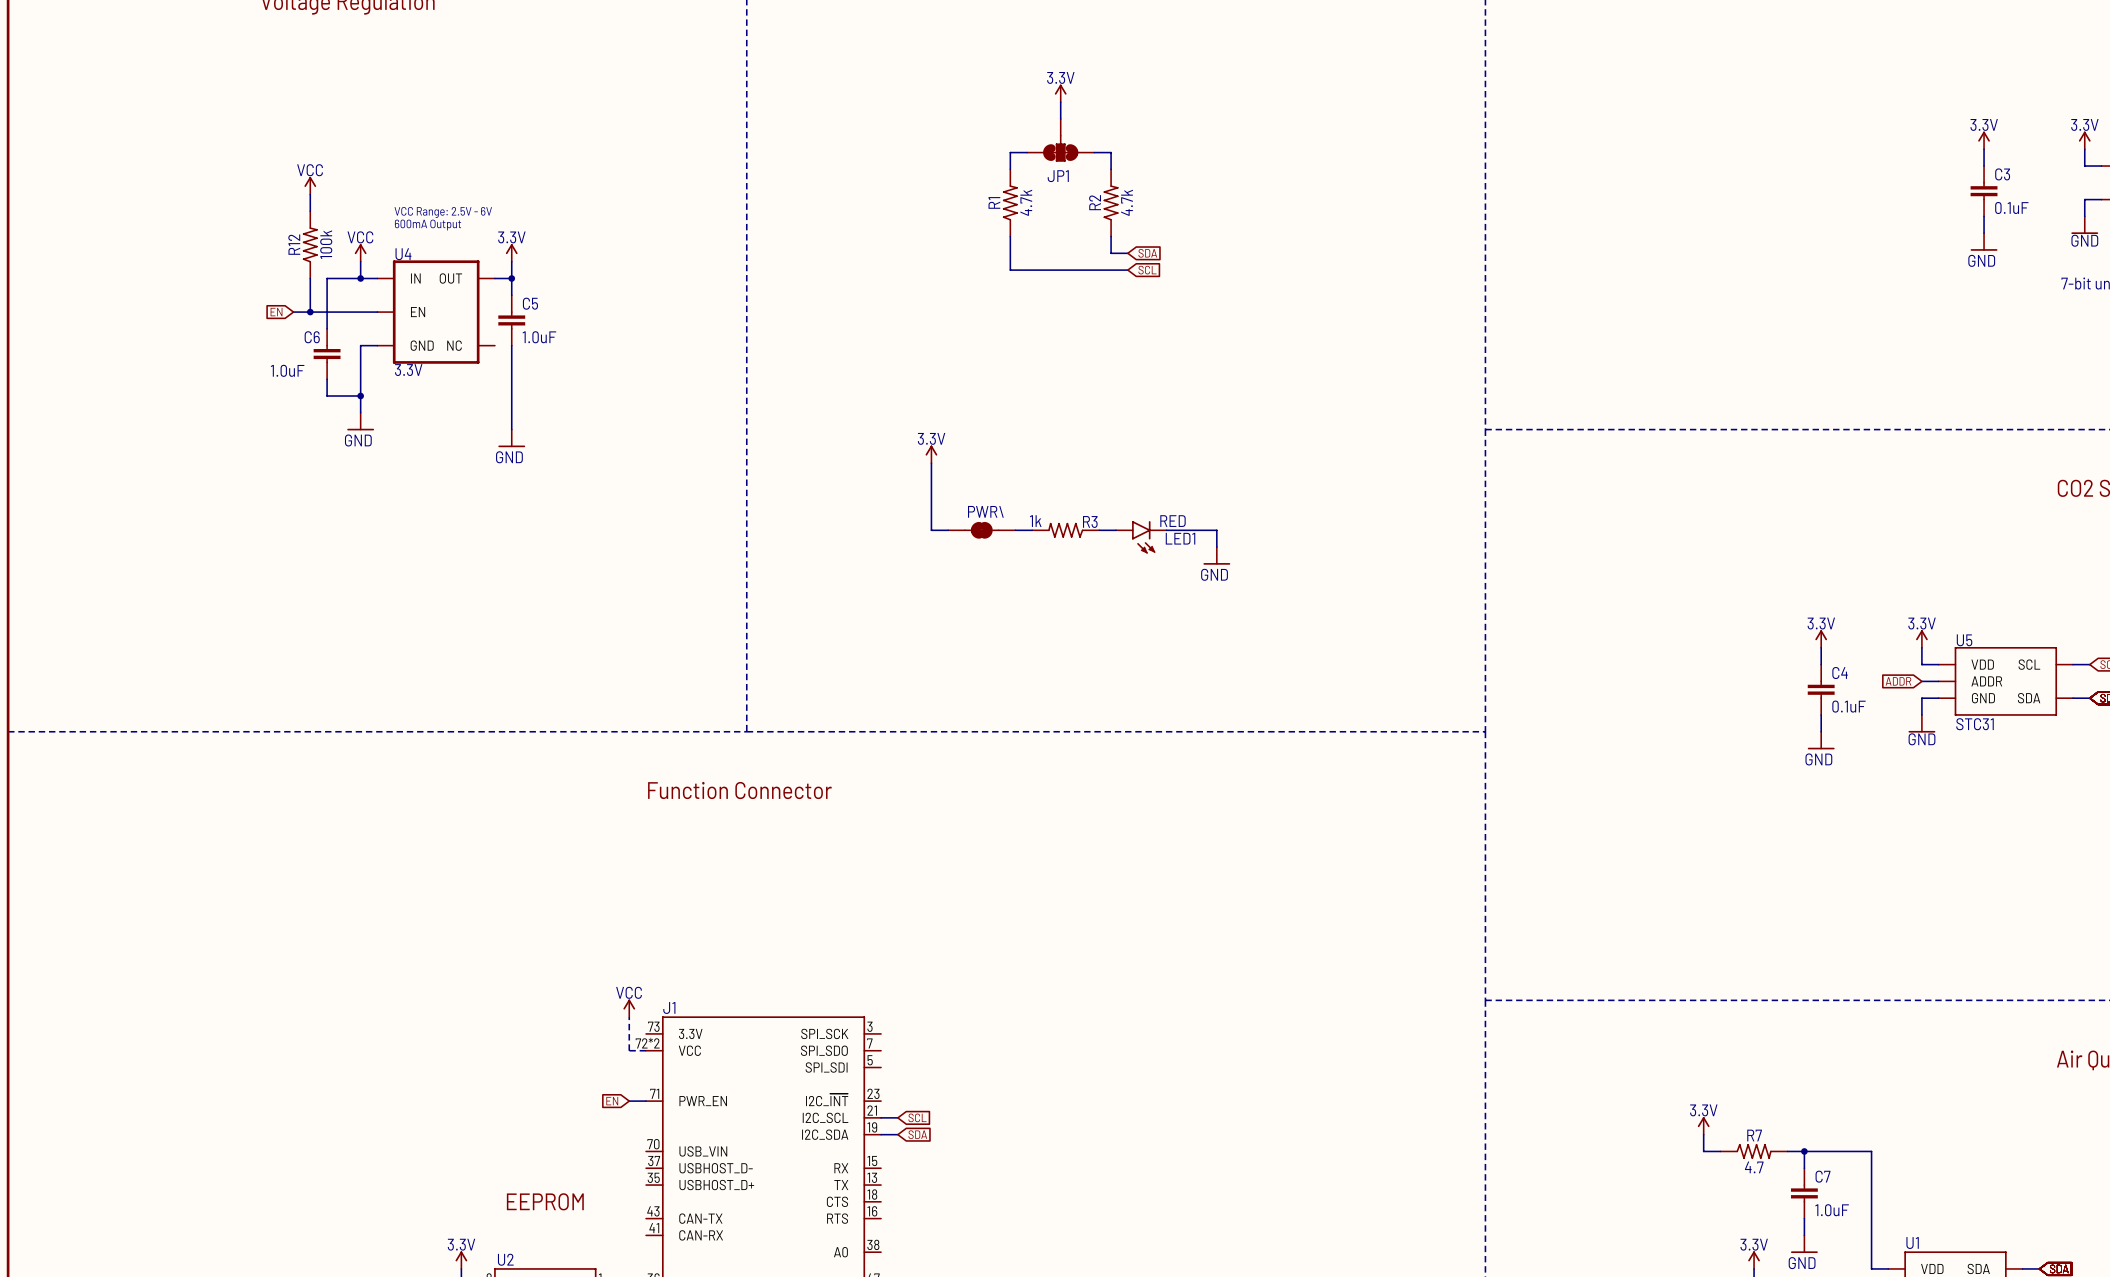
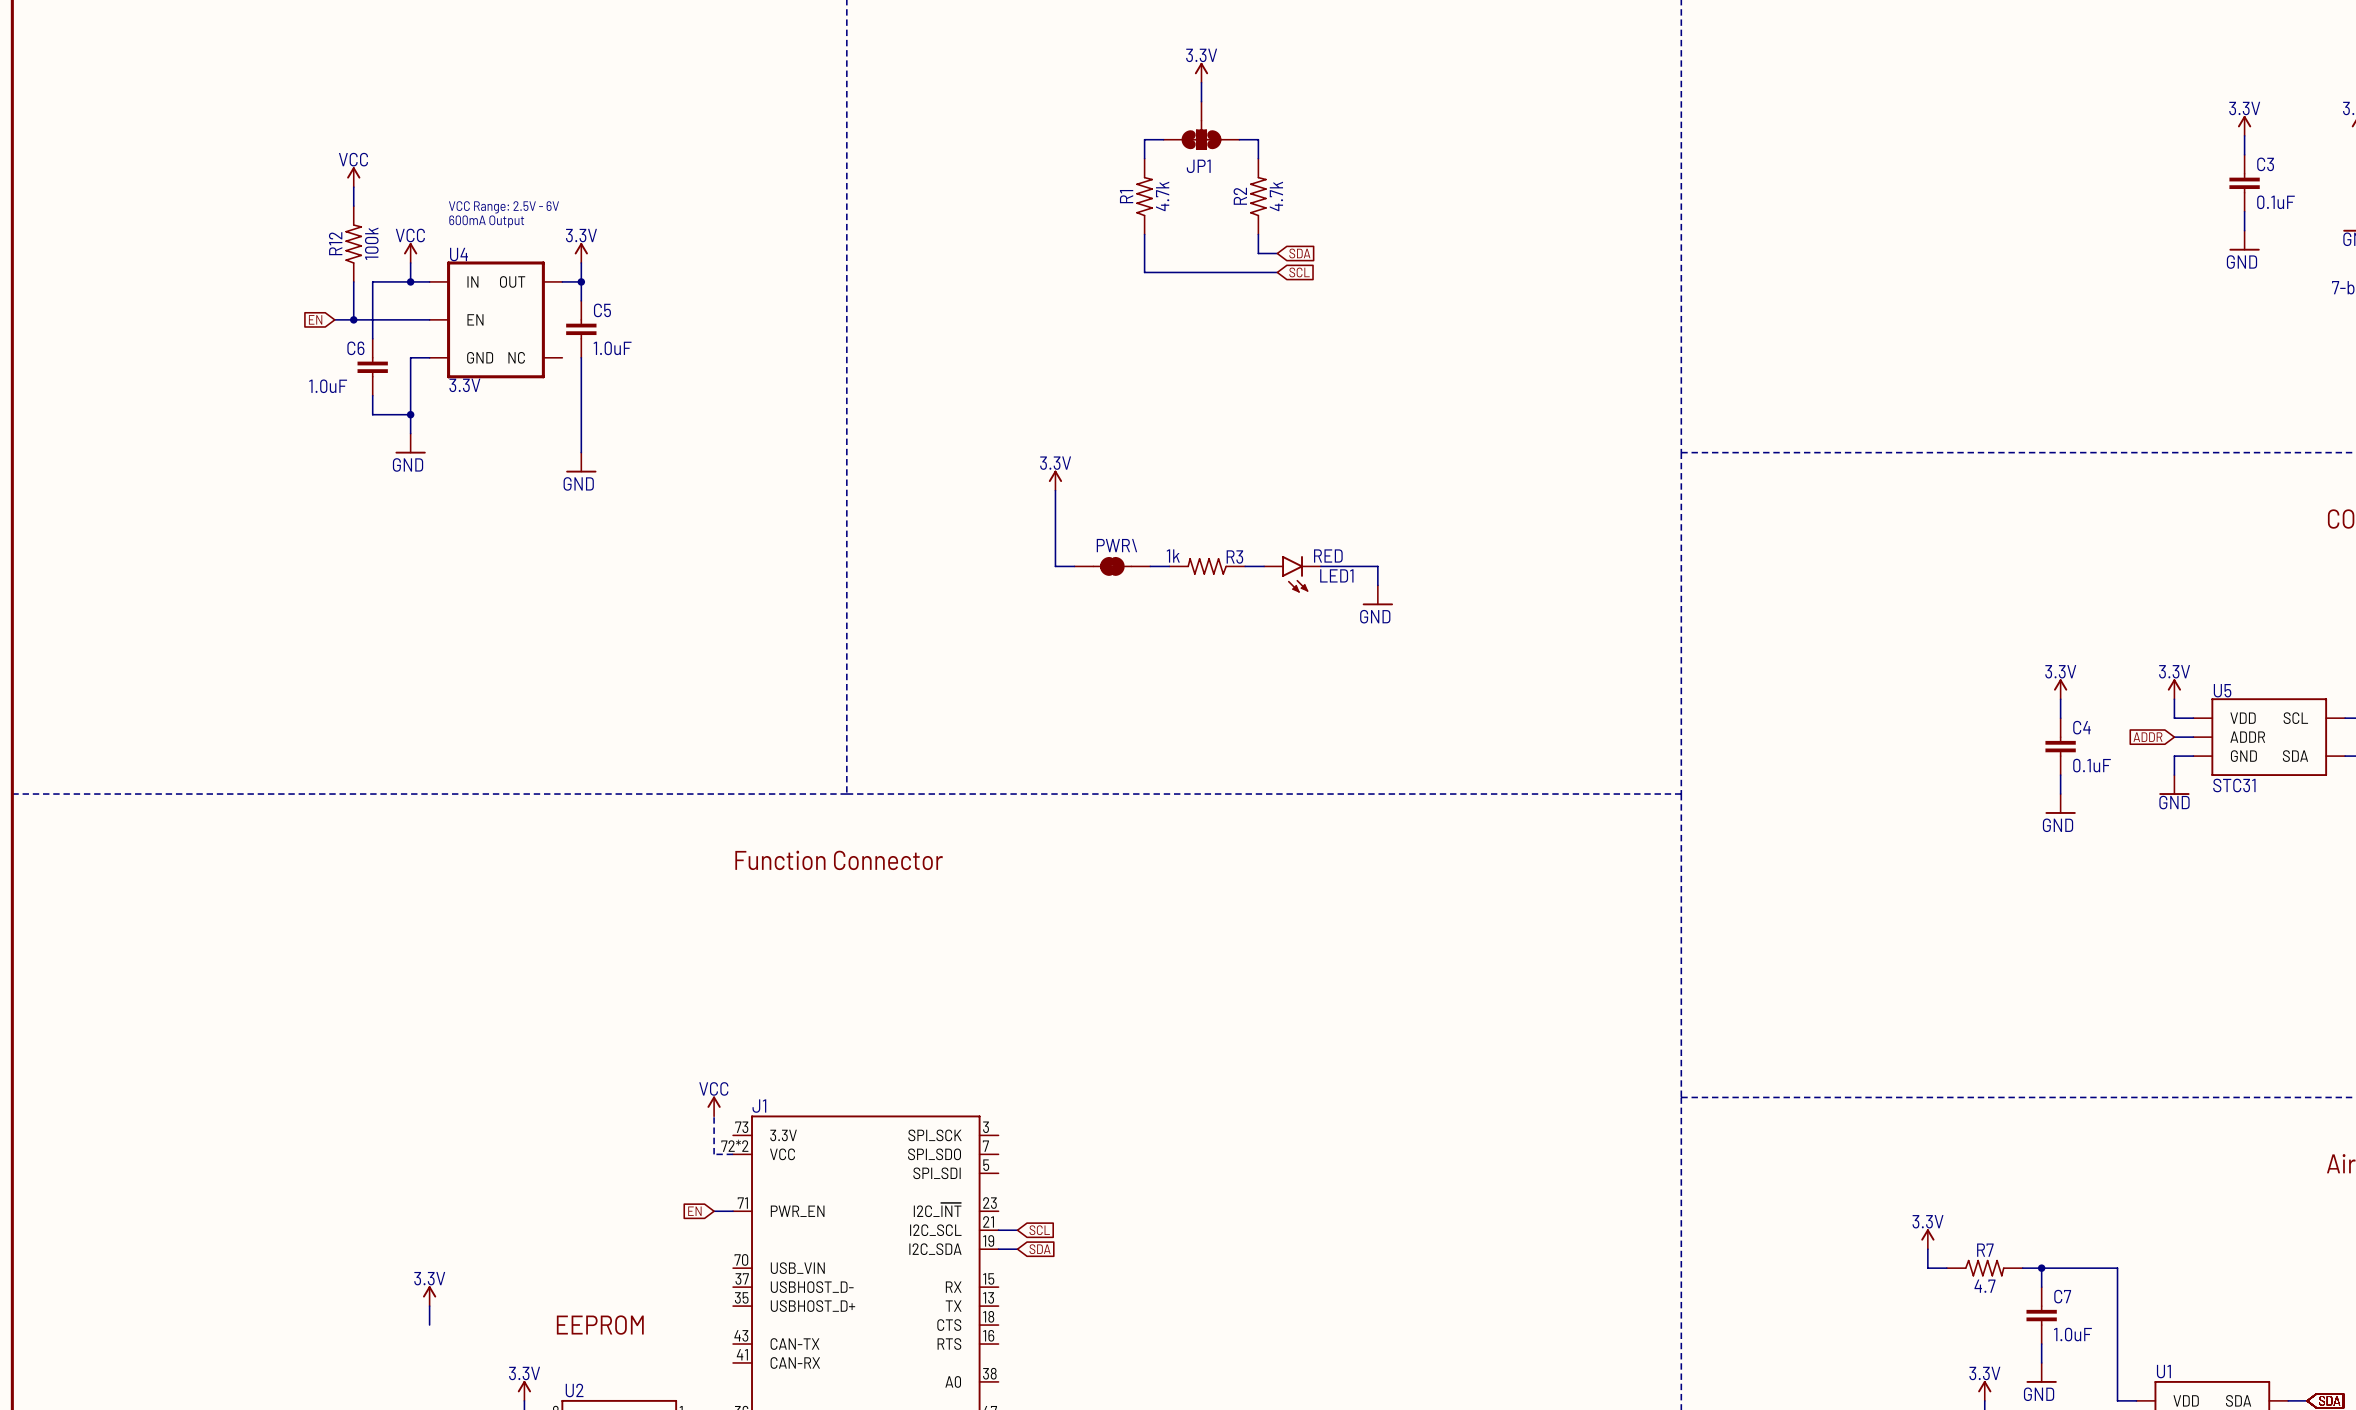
power symbol: none -> 3.3V (429, 1296)
wire: none -> (429, 1306) (429, 1325)
text position: EEPROM (545, 1201) -> EEPROM (600, 1325)

